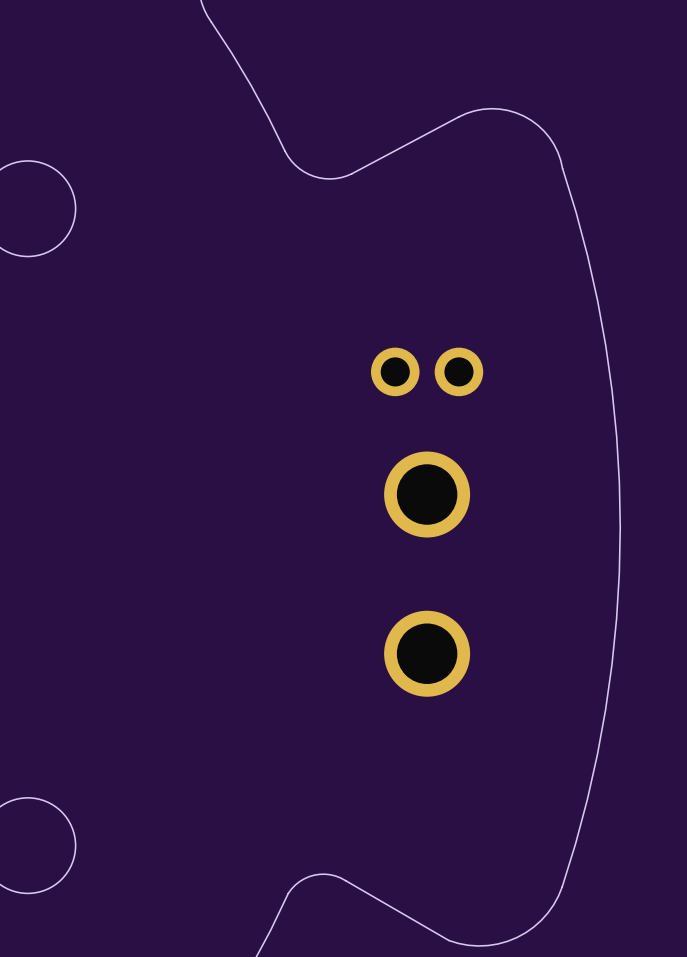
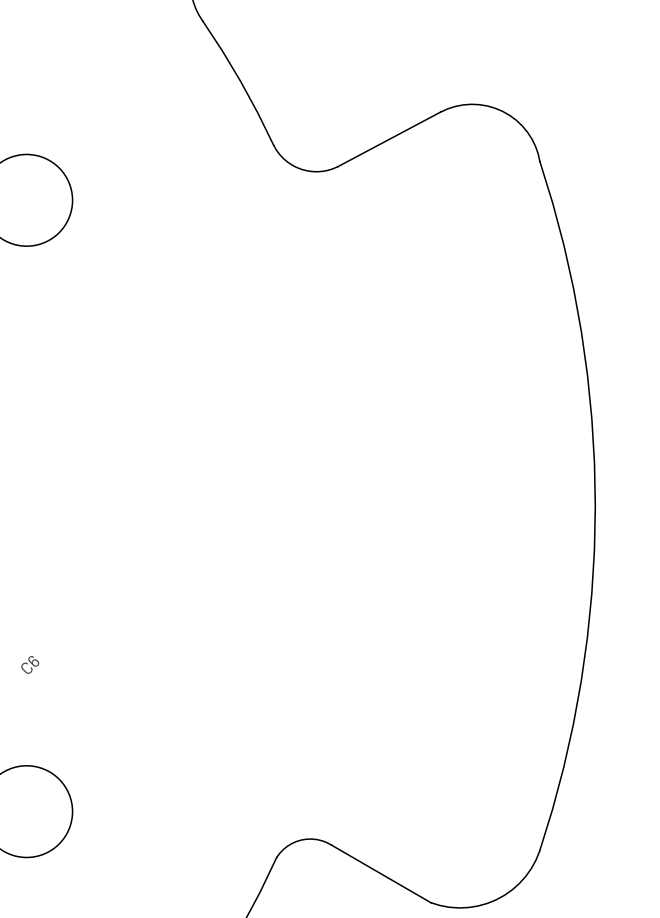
part: (427, 522) -> none
C6: none -> (30, 665)

